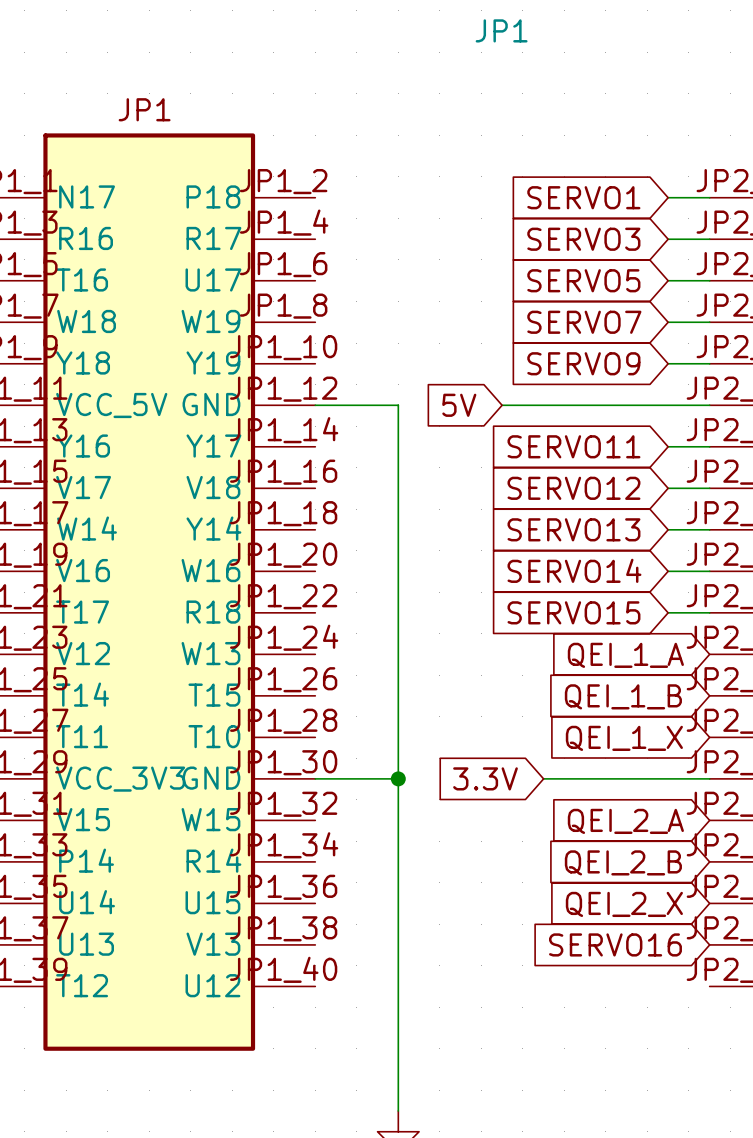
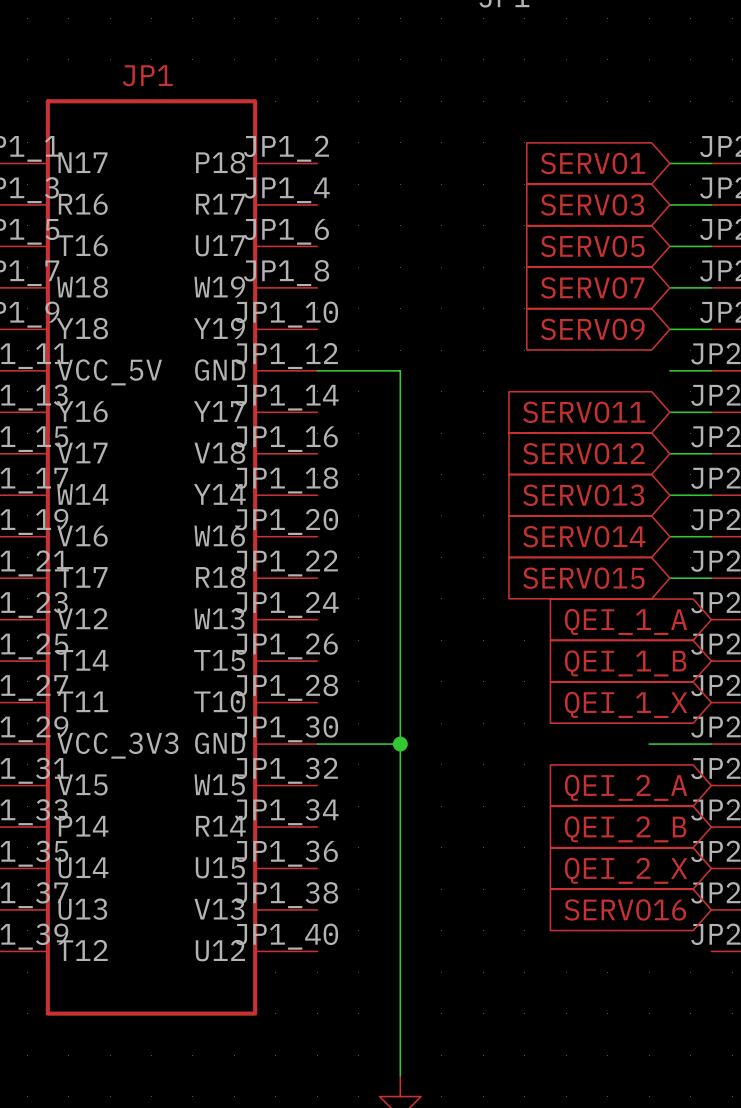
global label: 5V (459, 405) -> none
wire: (502, 405) (668, 405) -> none
global label: 3.3V (485, 778) -> none
wire: (543, 778) (647, 778) -> none

